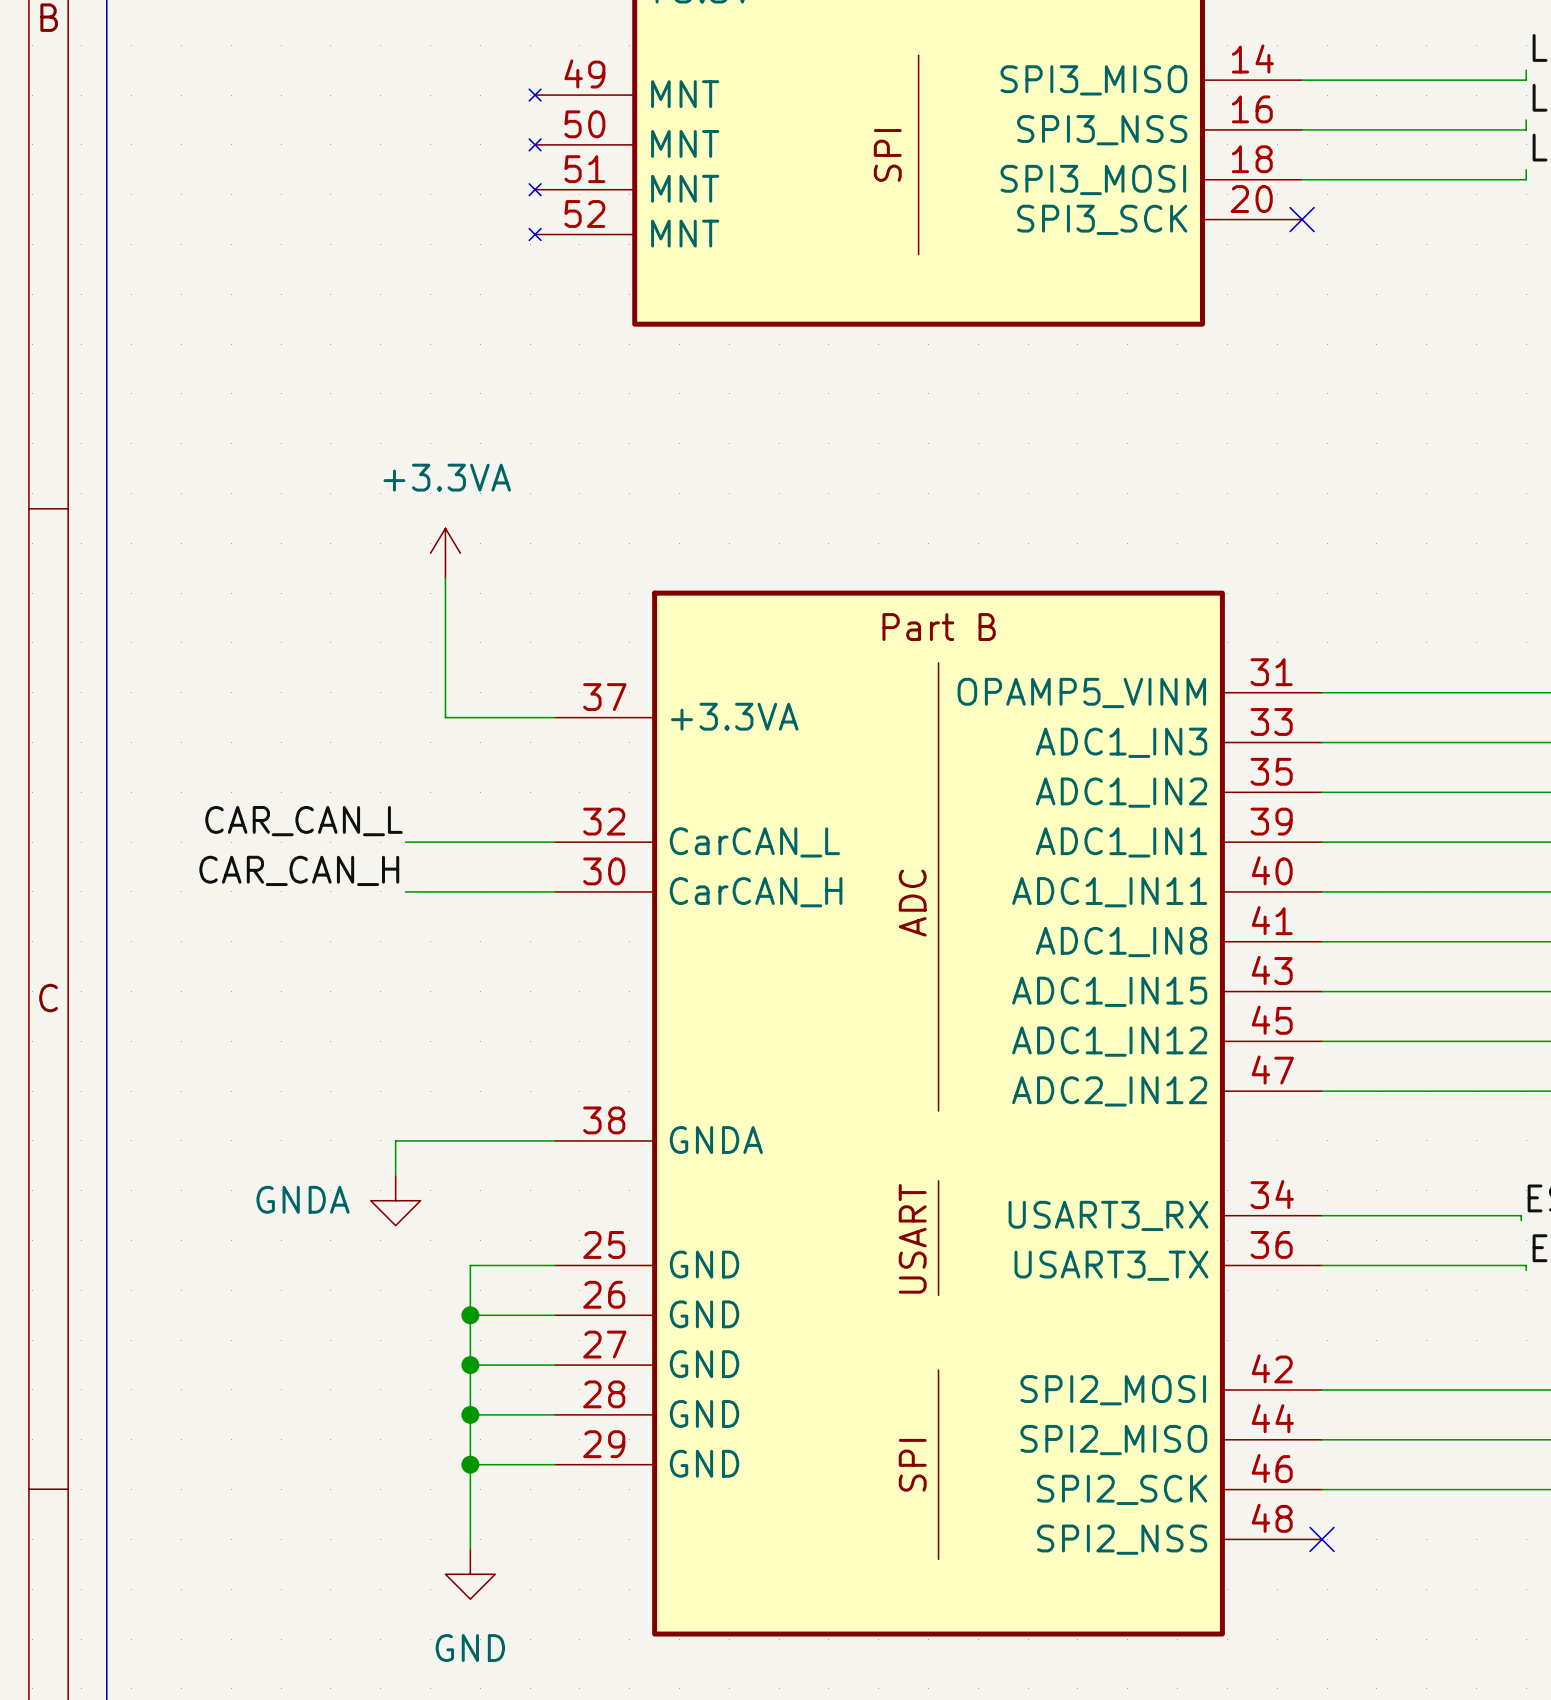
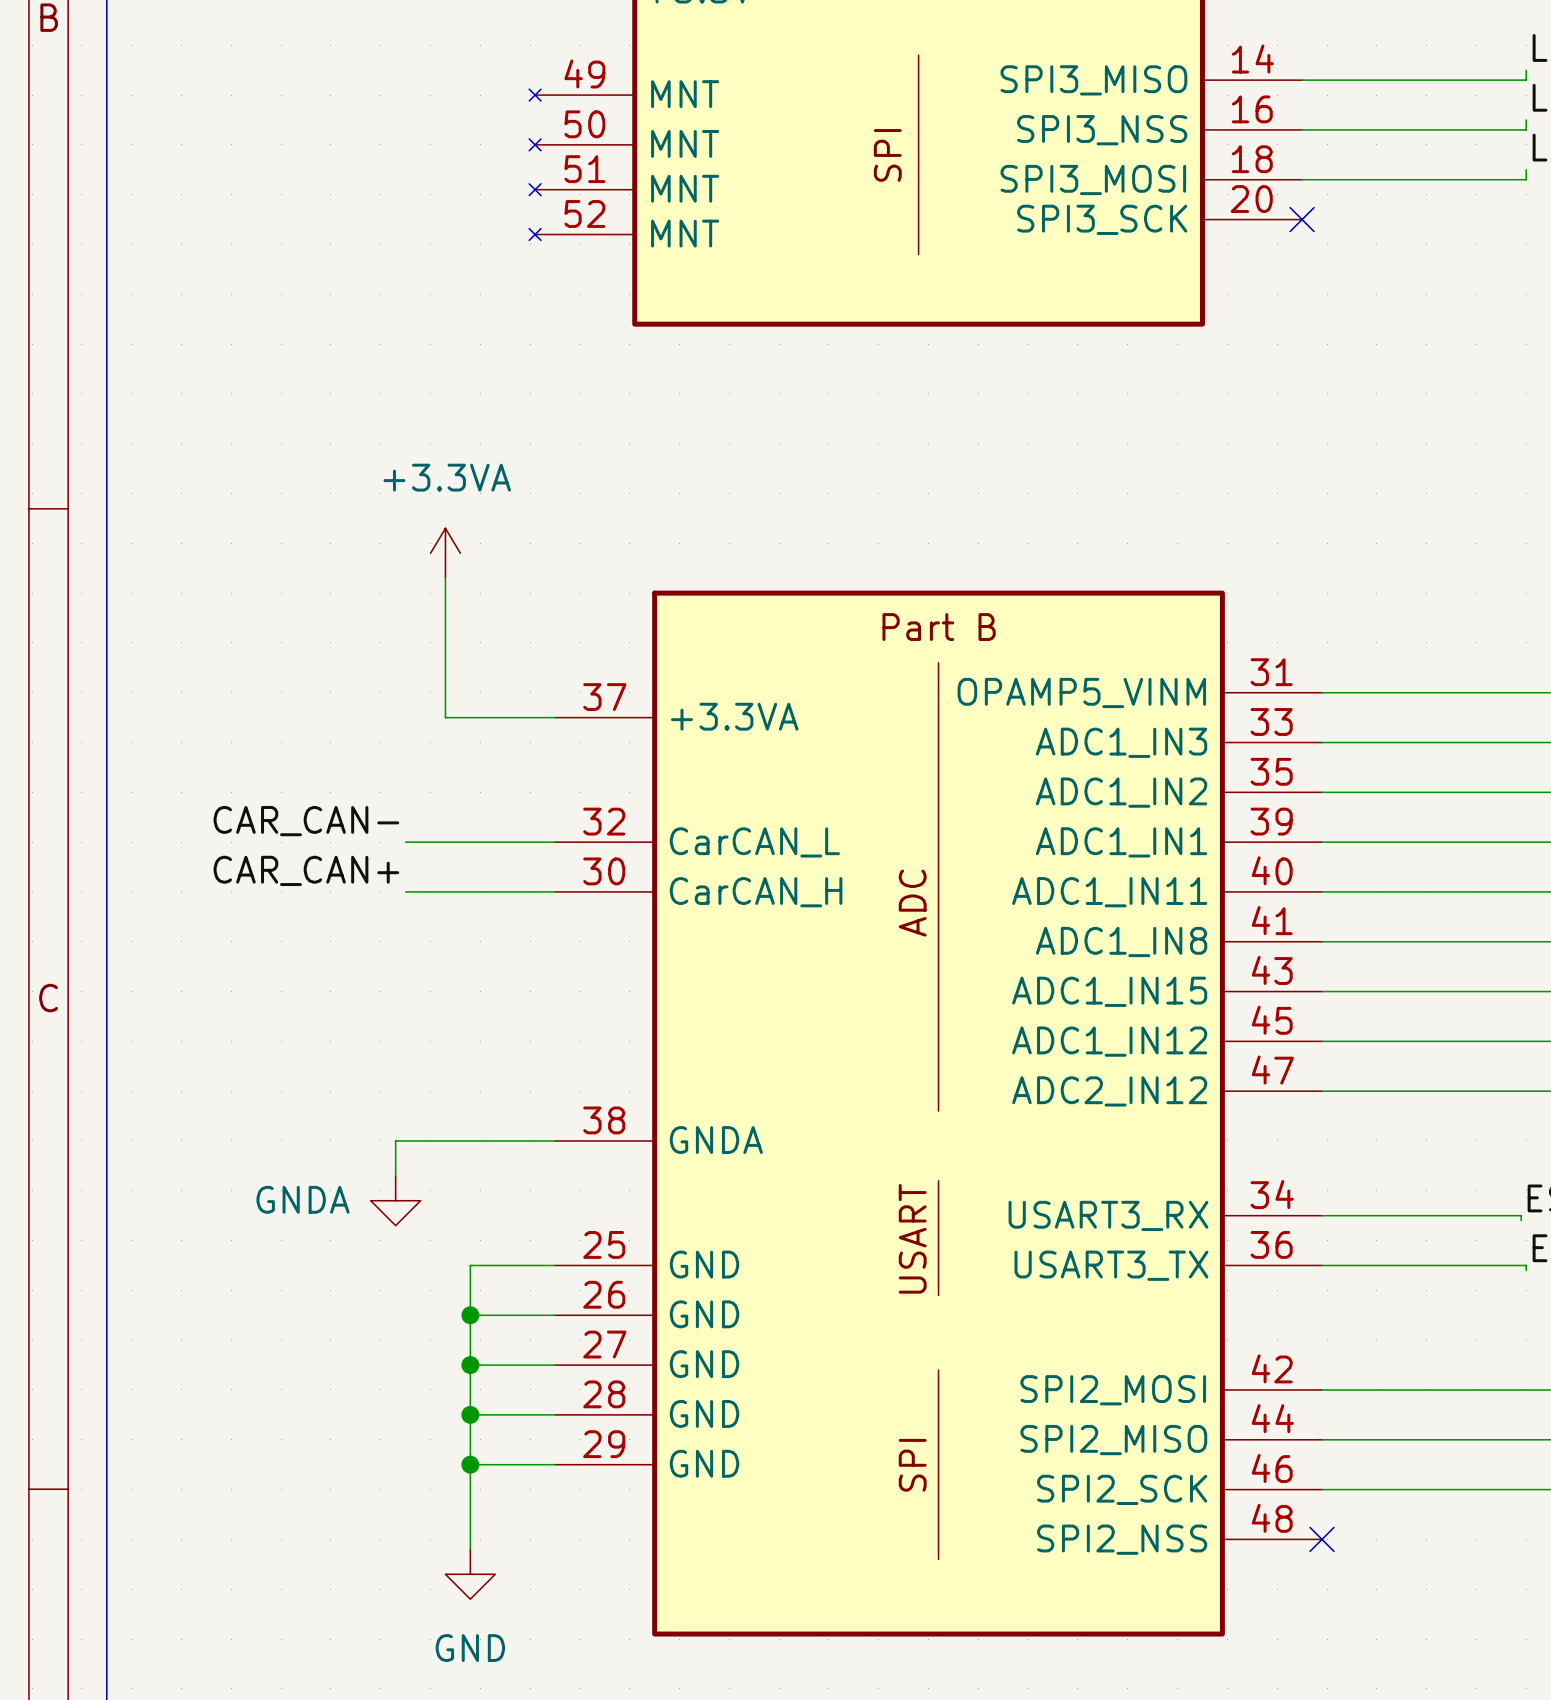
label: CAR_CAN_L (304, 821) -> CAR_CAN- (306, 821)
label: CAR_CAN_H (299, 870) -> CAR_CAN+ (306, 870)

